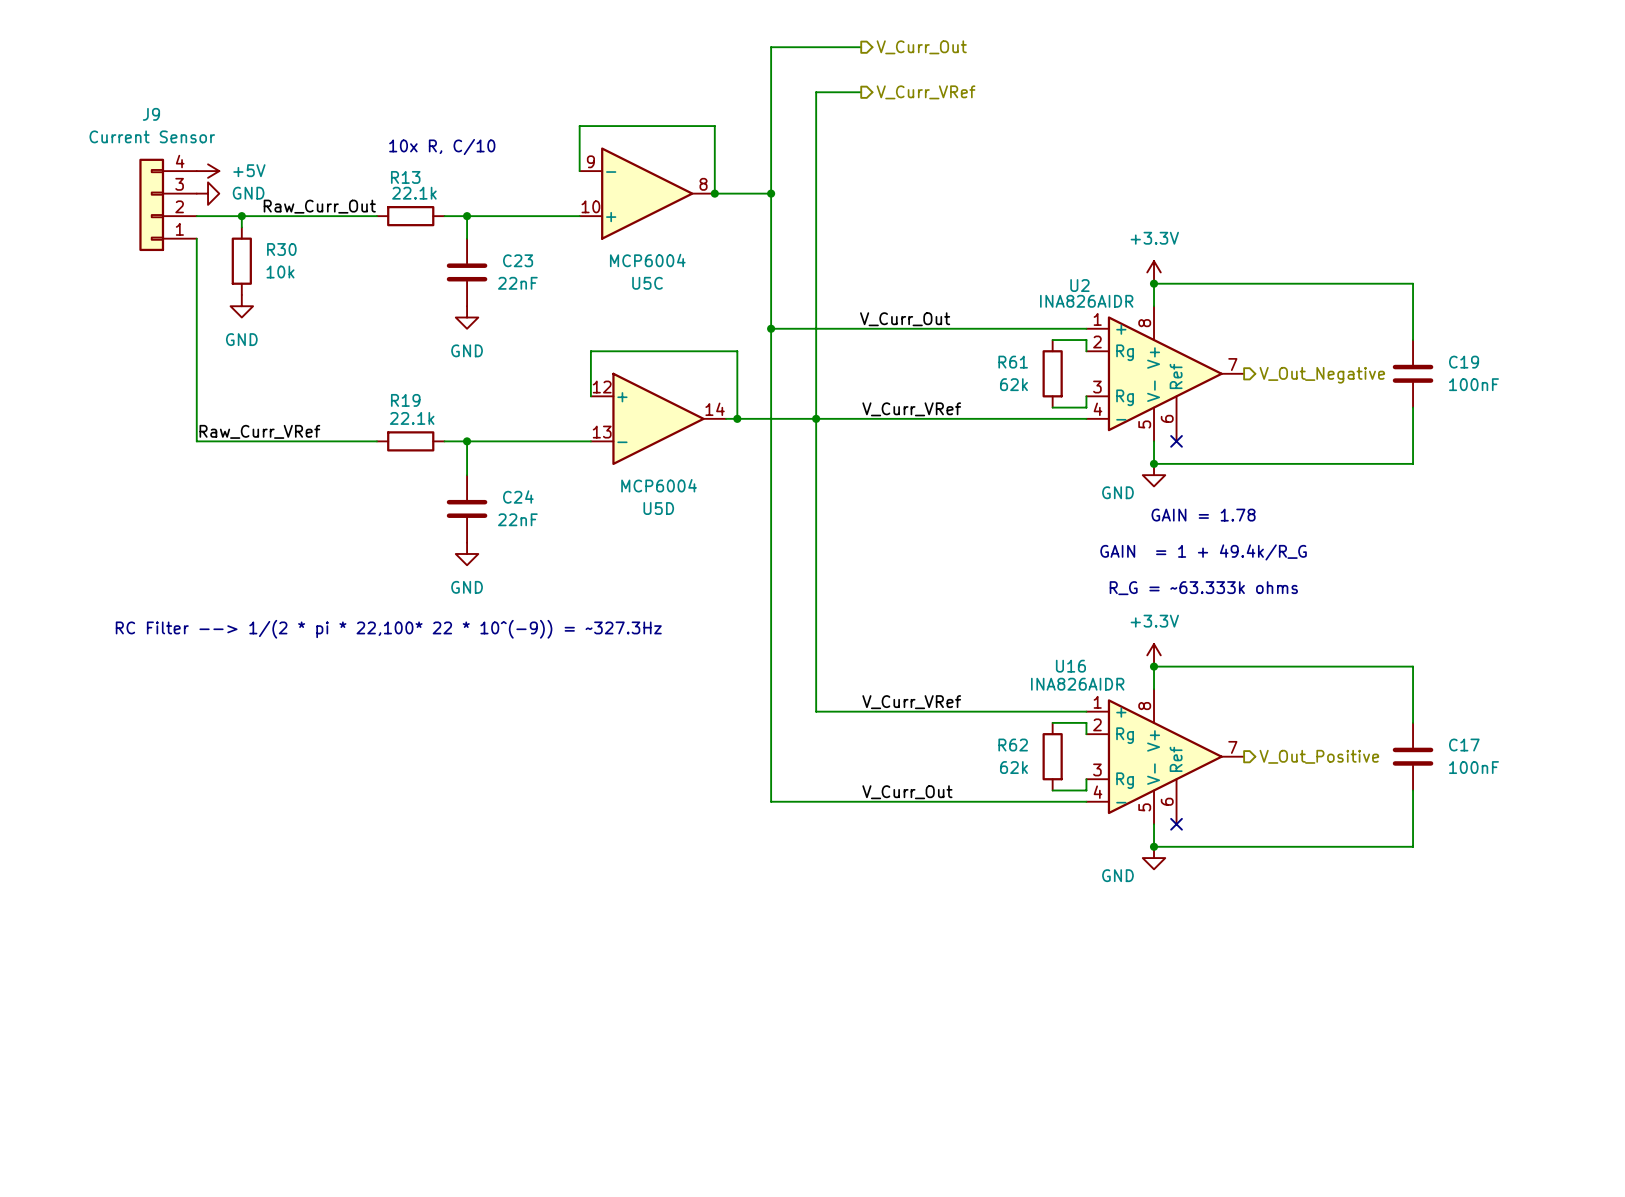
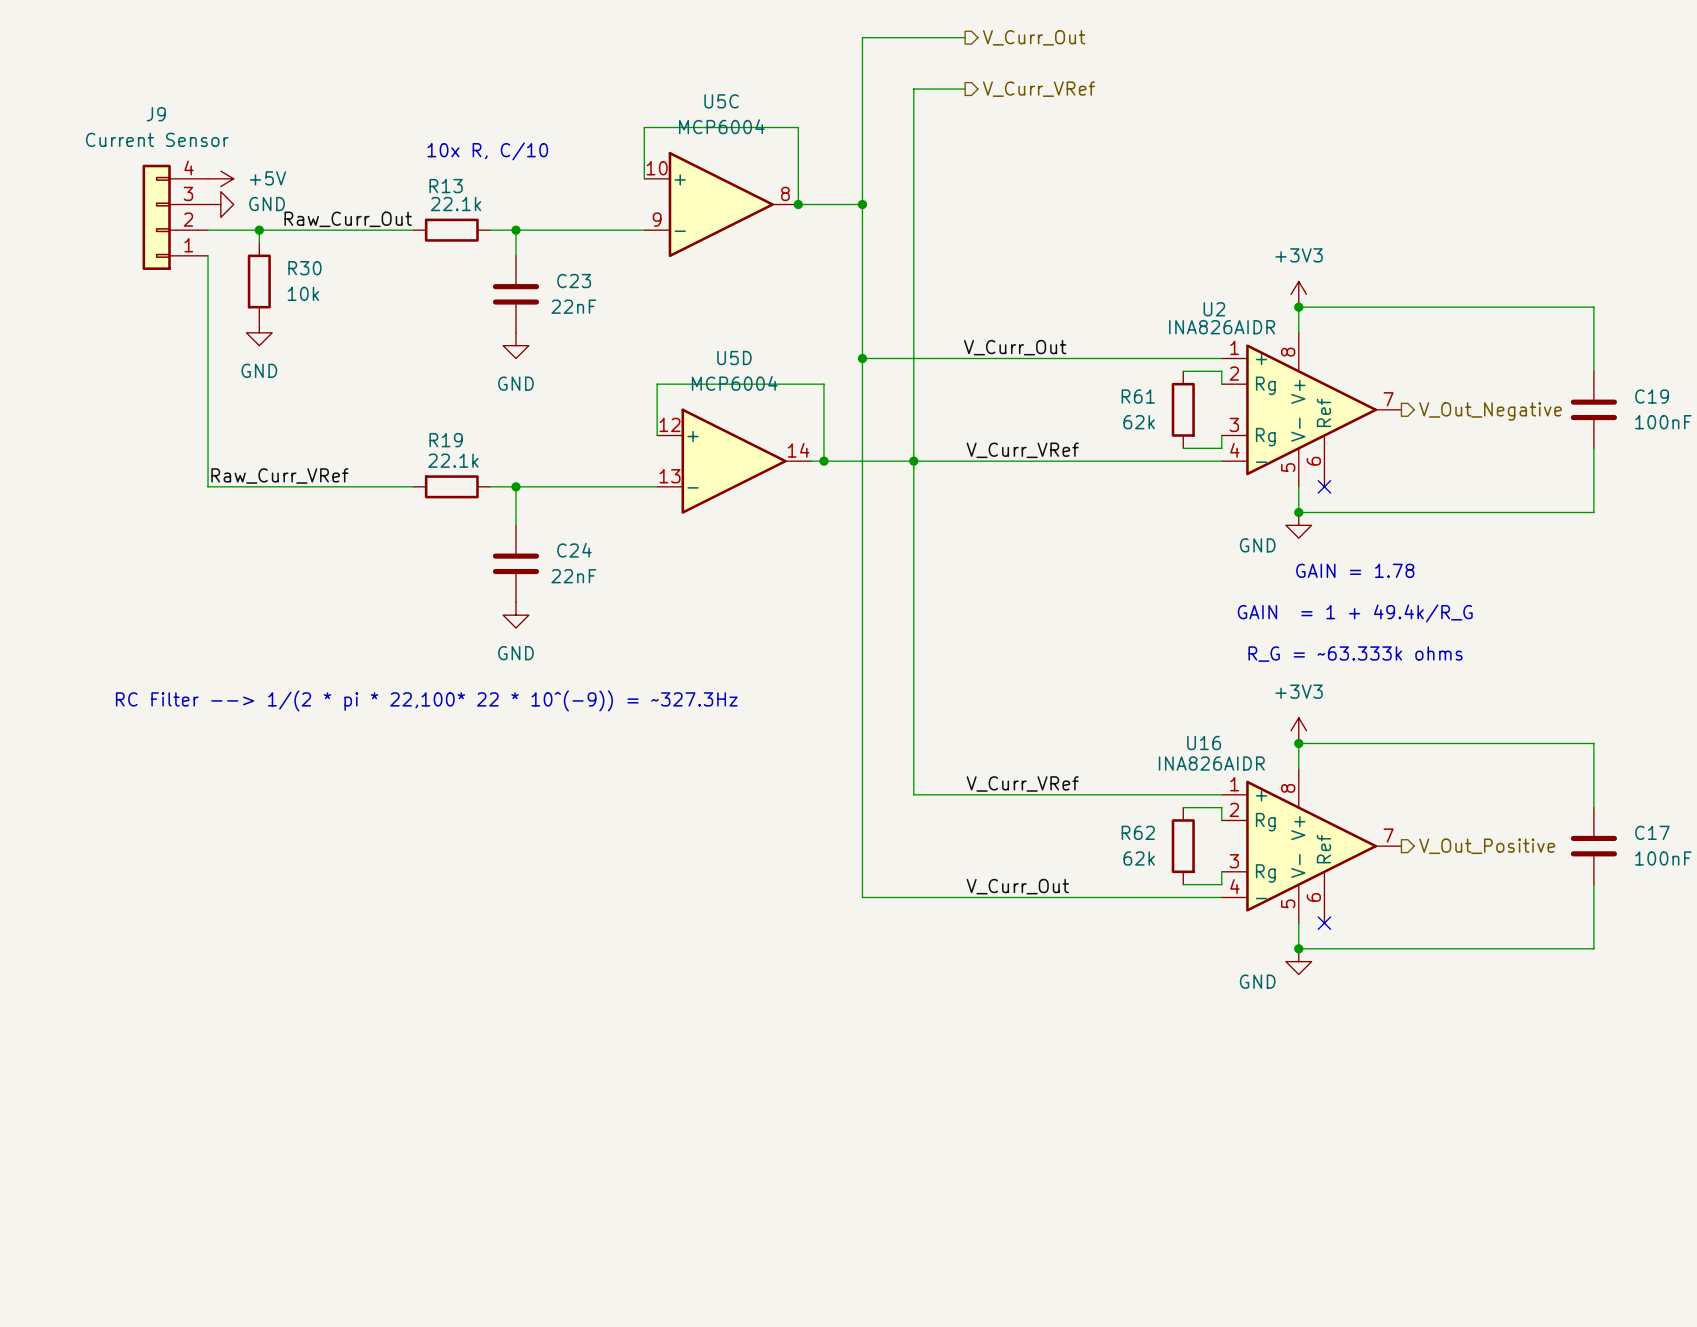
U5C flip: as is (647, 193) -> up-down (721, 204)
power symbol: +3.3V (1154, 272) -> +3V3 (1298, 294)
U5D value position: MCP6004 (659, 485) -> MCP6004 (734, 383)
U5D name position: U5D (658, 508) -> U5D (734, 358)
power symbol: +3.3V (1154, 655) -> +3V3 (1298, 730)

